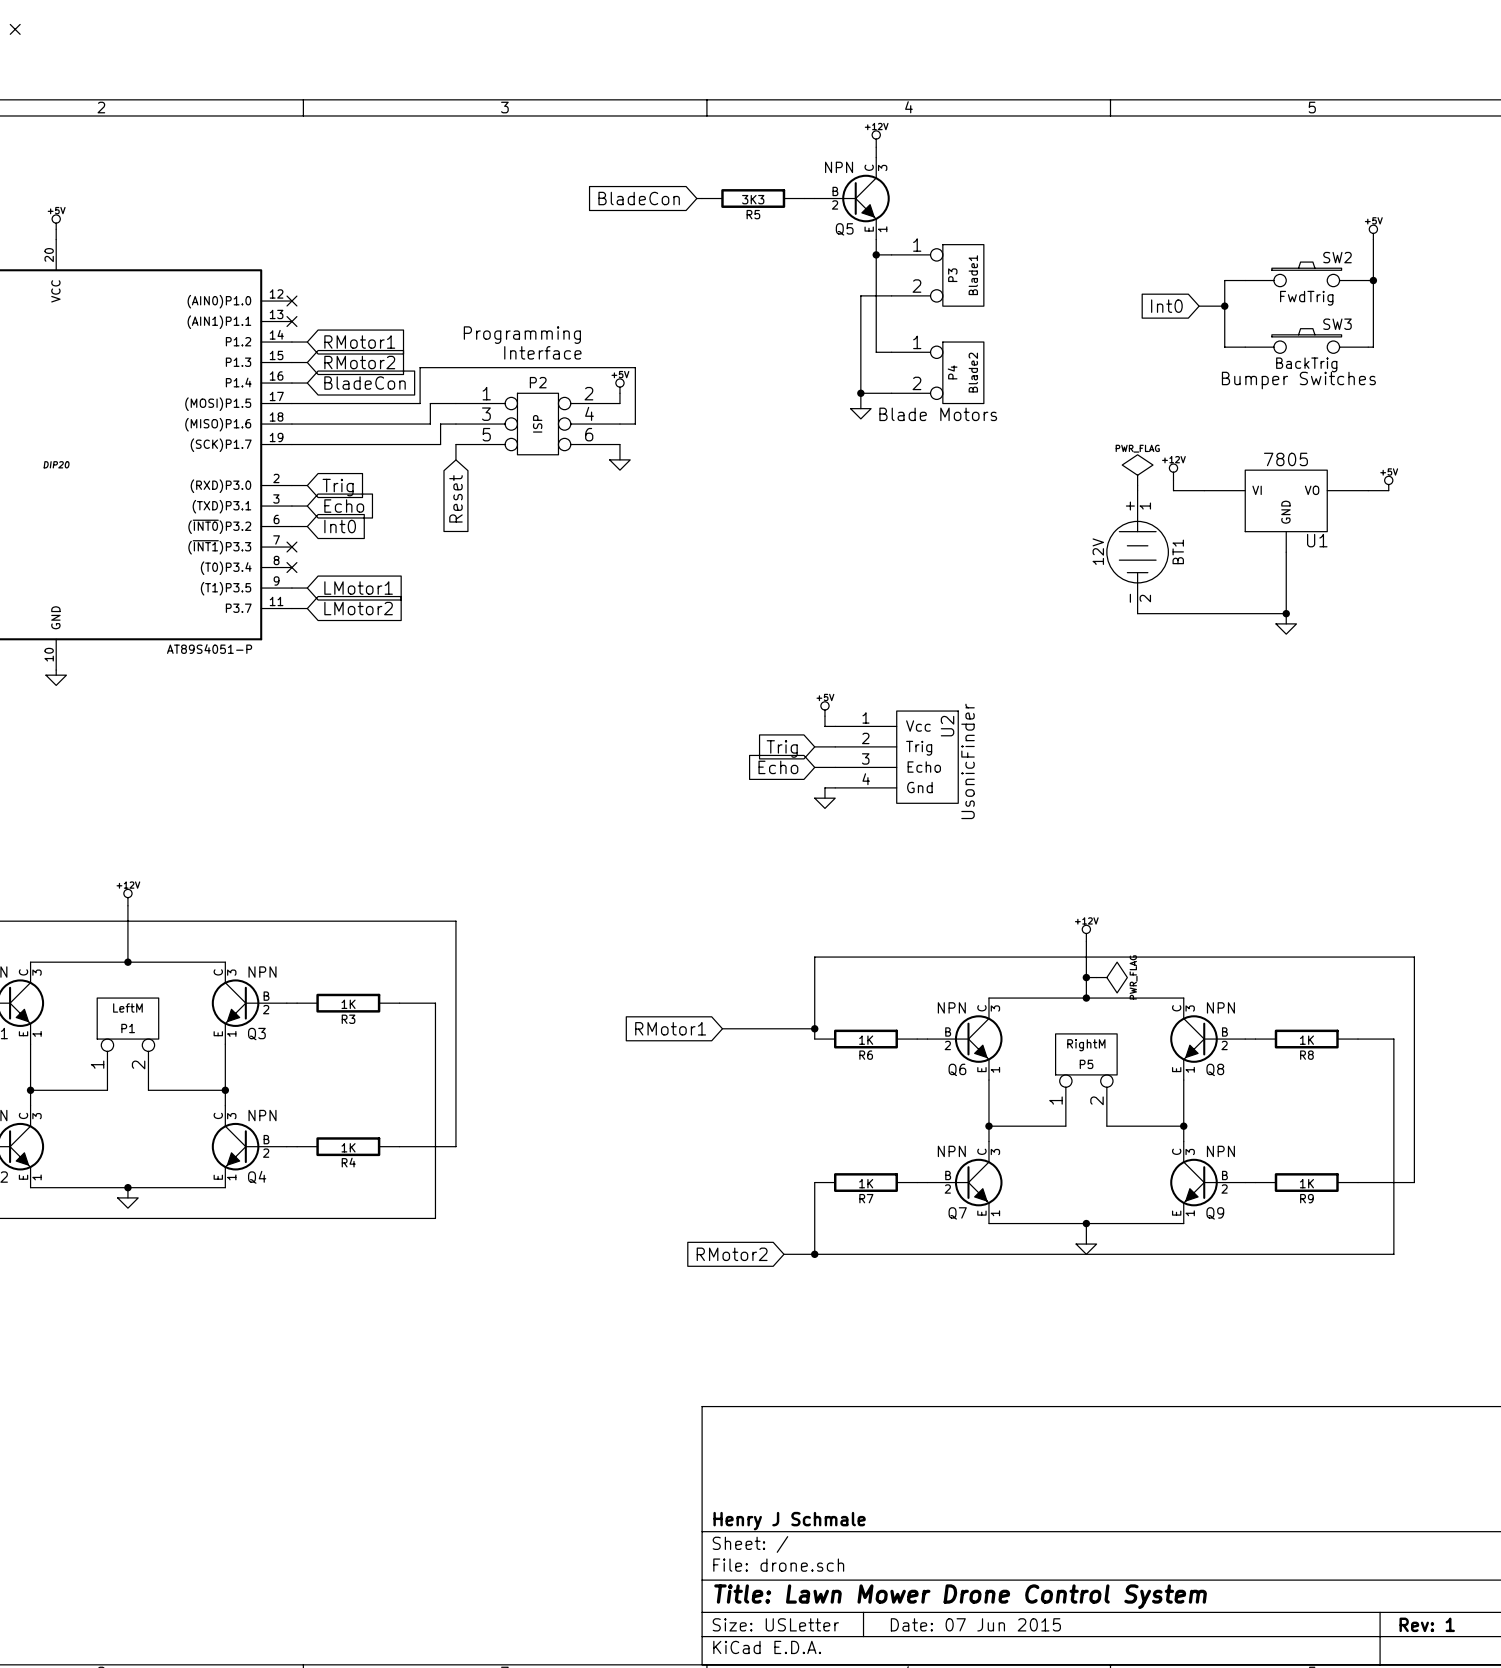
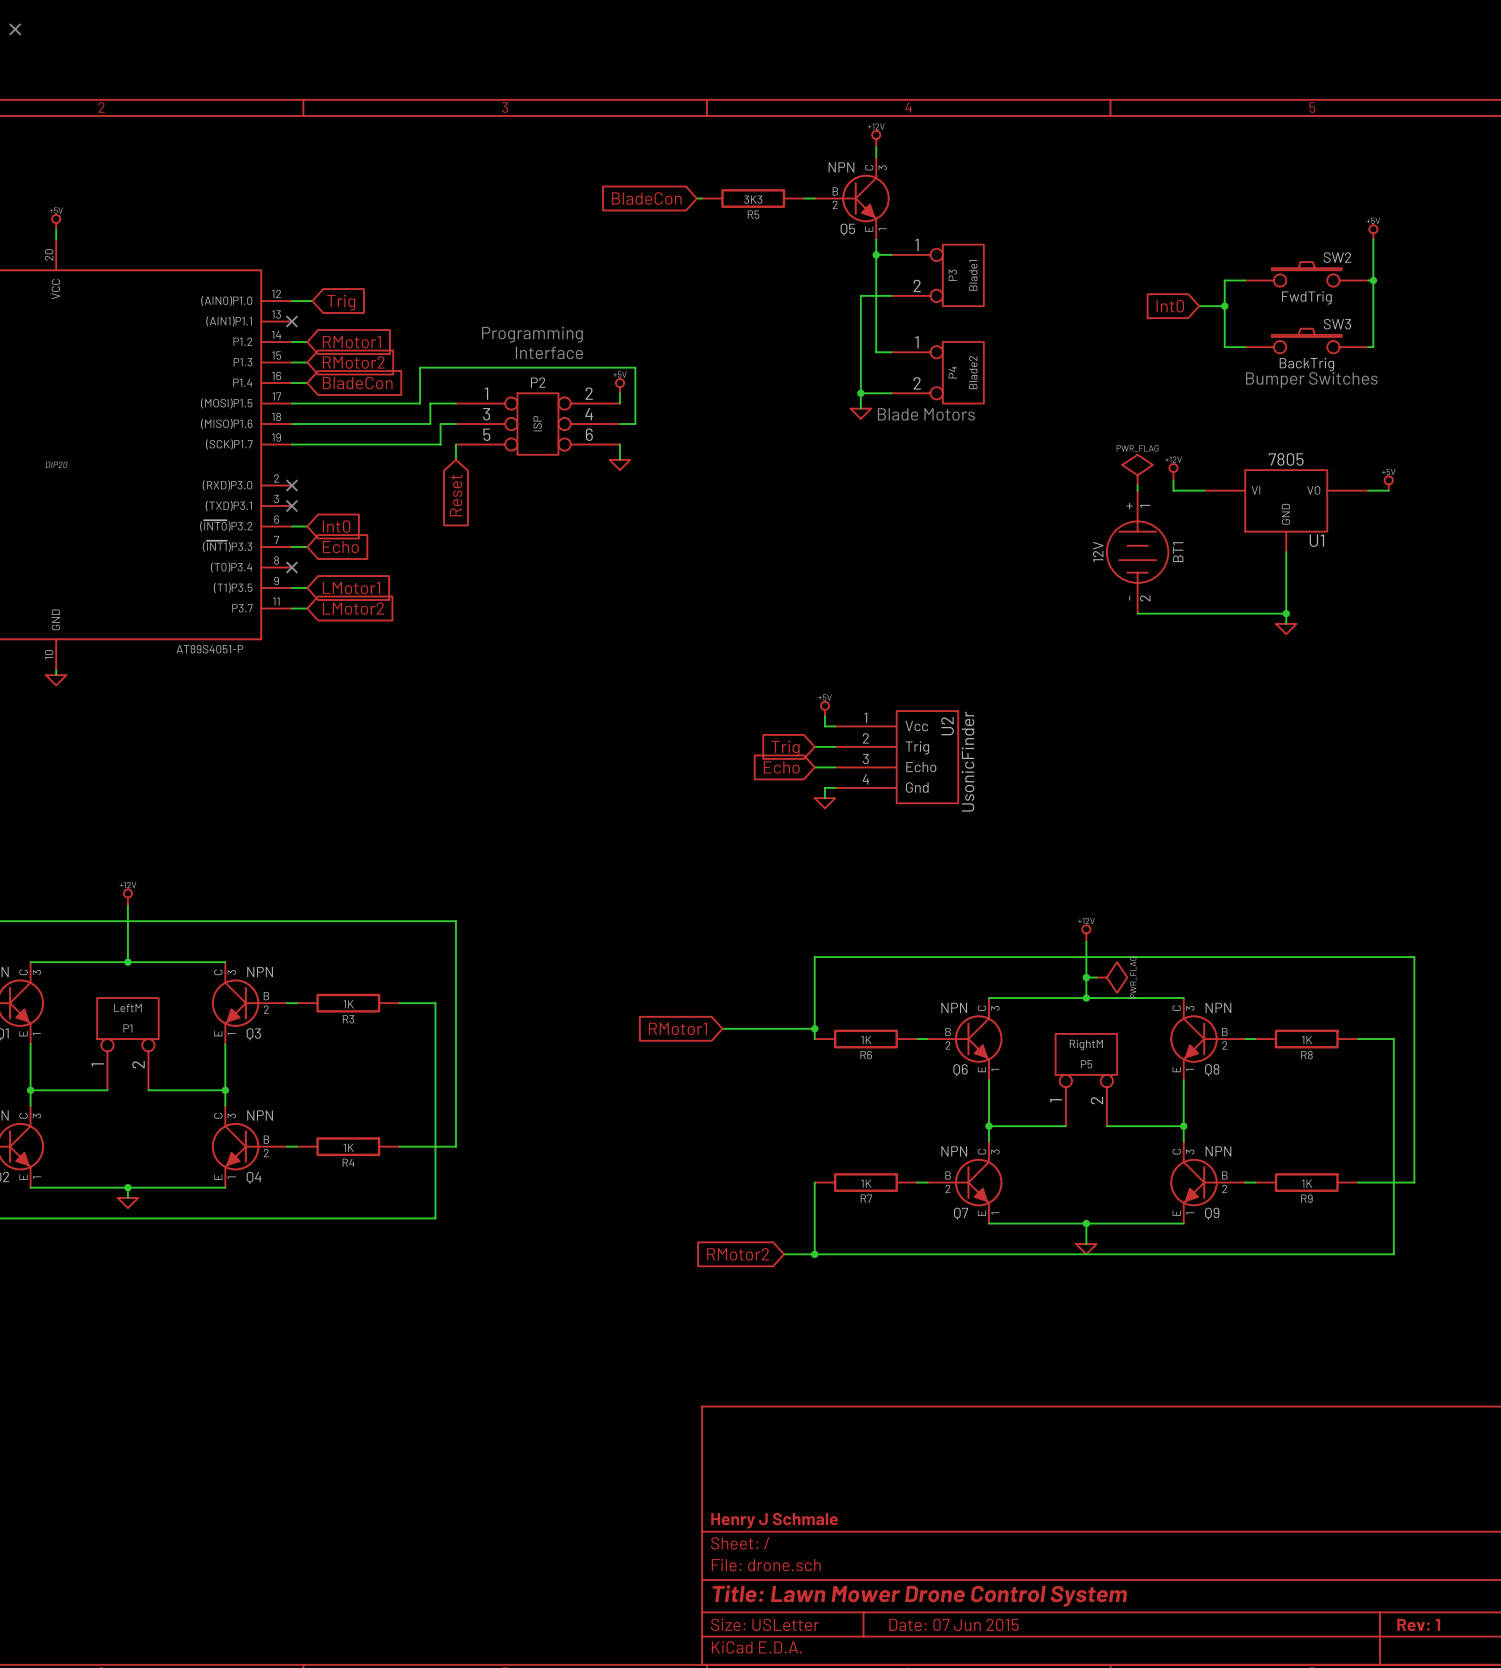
wire: none -> (291, 301) (312, 301)
no-connect mark: (291, 301) -> none
wire: (291, 485) (307, 485) -> none
no-connect mark: none -> (291, 485)
global label position: Trig (338, 487) -> Trig (341, 302)
wire: (291, 506) (307, 506) -> (291, 547) (307, 547)
no-connect mark: none -> (291, 506)
global label position: Echo (344, 506) -> Echo (340, 547)
no-connect mark: (291, 547) -> none

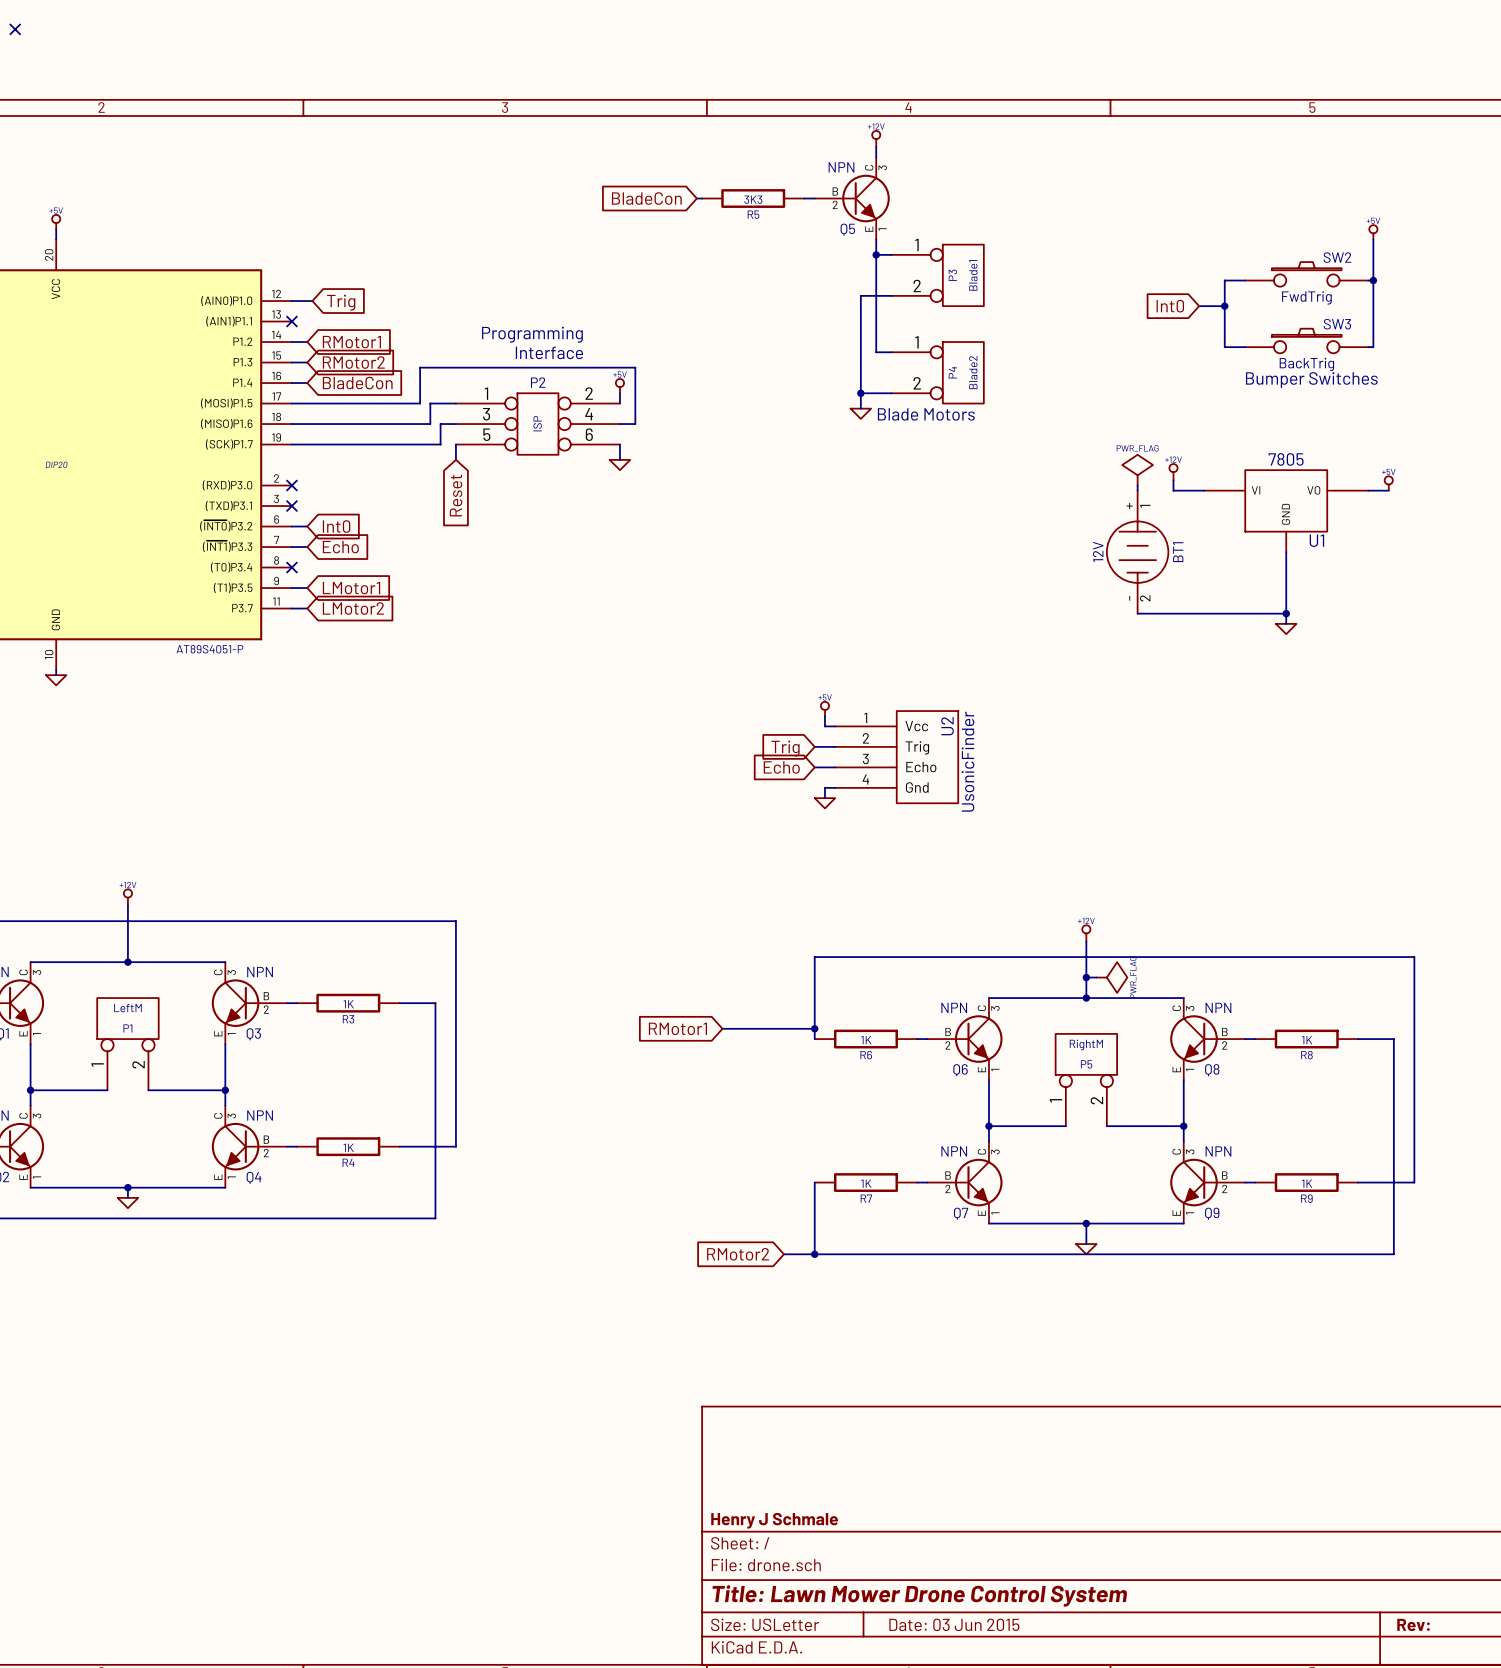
title block: Date: 07 Jun 2015 (954, 1624) -> Date: 03 Jun 2015 (954, 1624)
title block: Rev: 1 (1418, 1624) -> Rev: (1413, 1624)

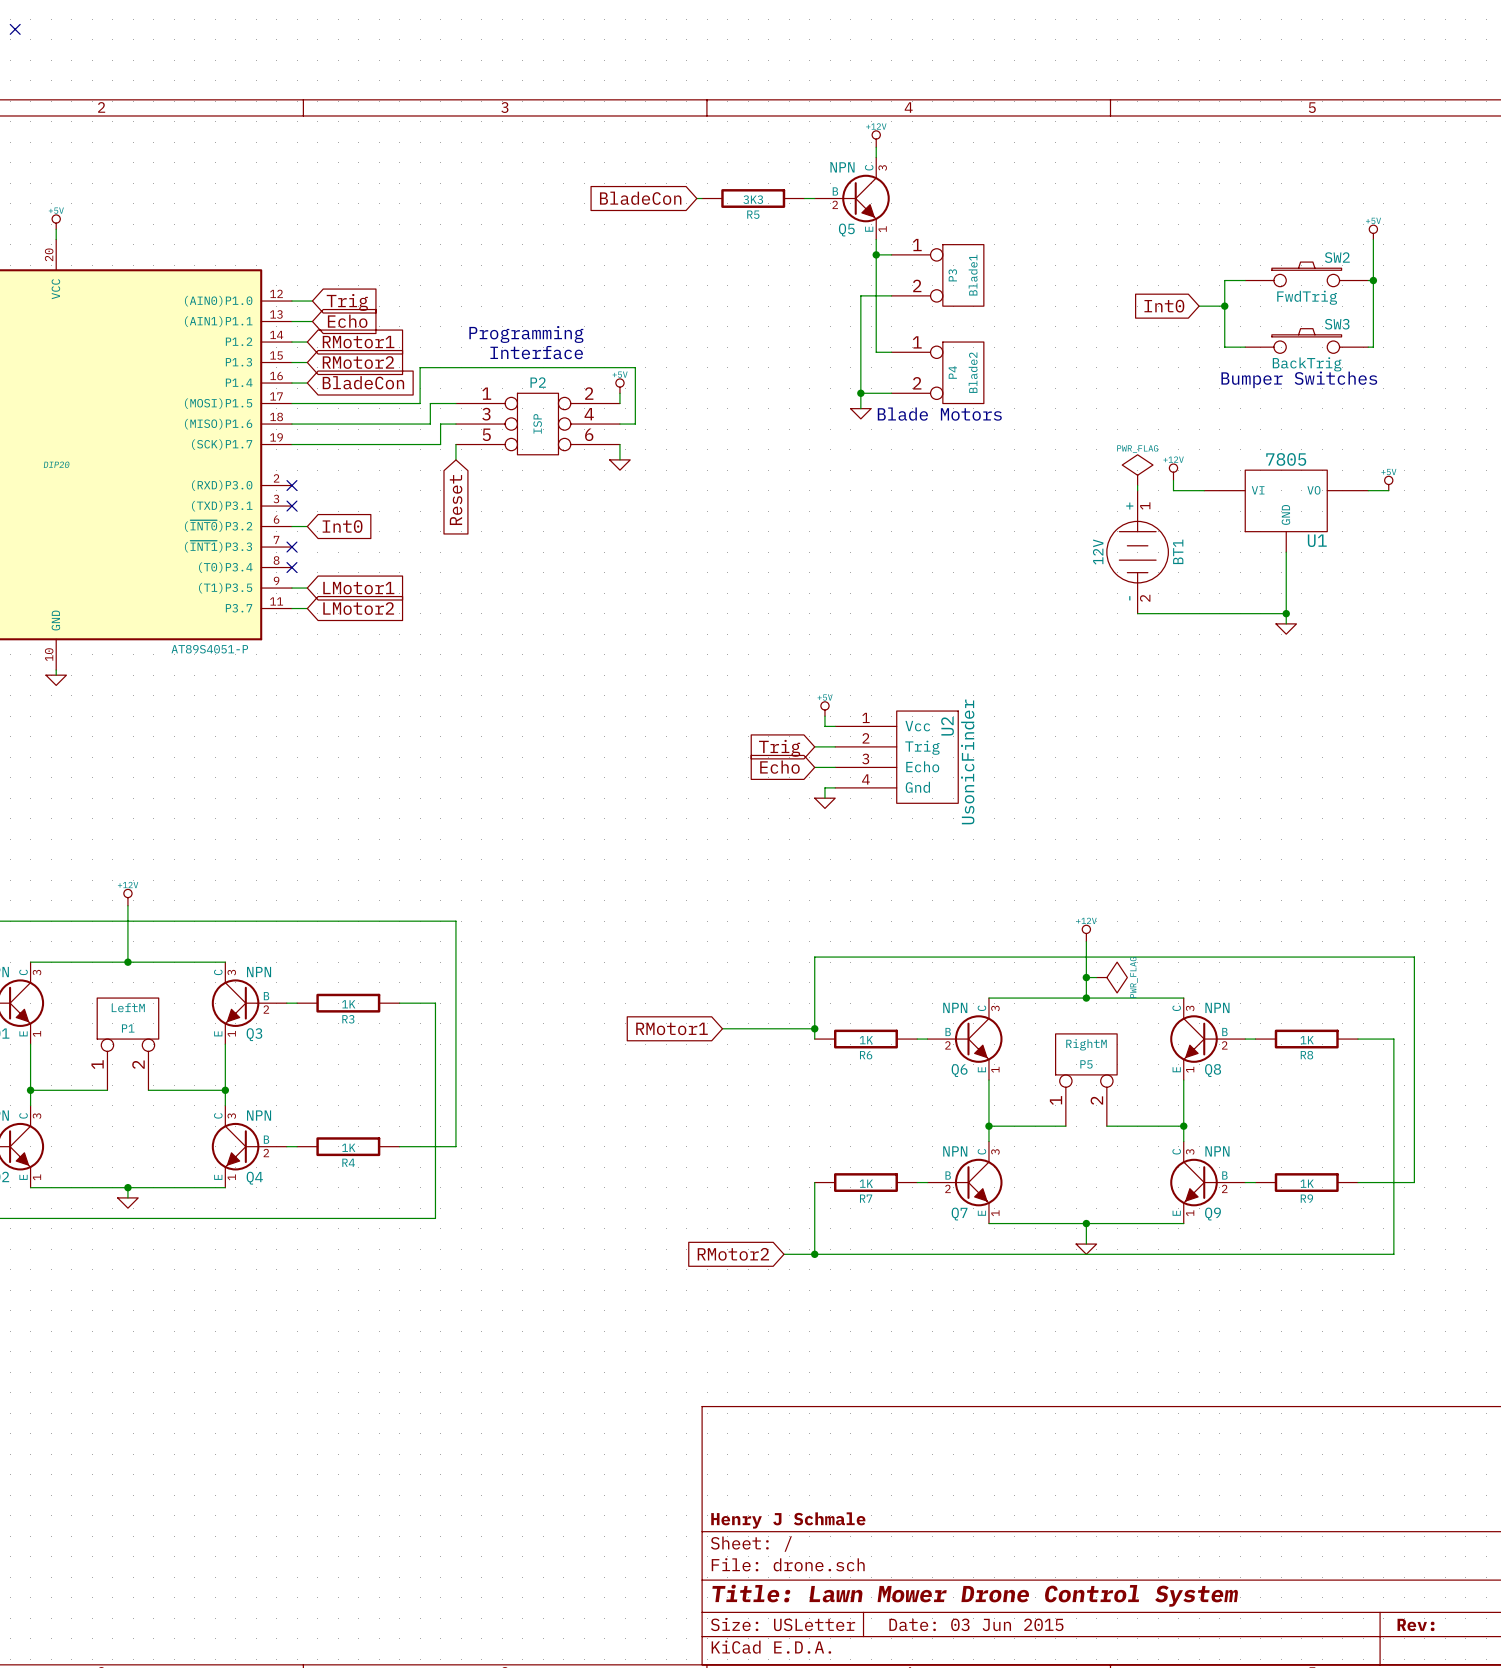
wire: none -> (291, 321) (312, 321)
no-connect mark: (291, 321) -> none
global label: none -> Echo (347, 321)
wire: (291, 547) (307, 547) -> none
no-connect mark: none -> (291, 547)
global label: Echo (340, 547) -> none

